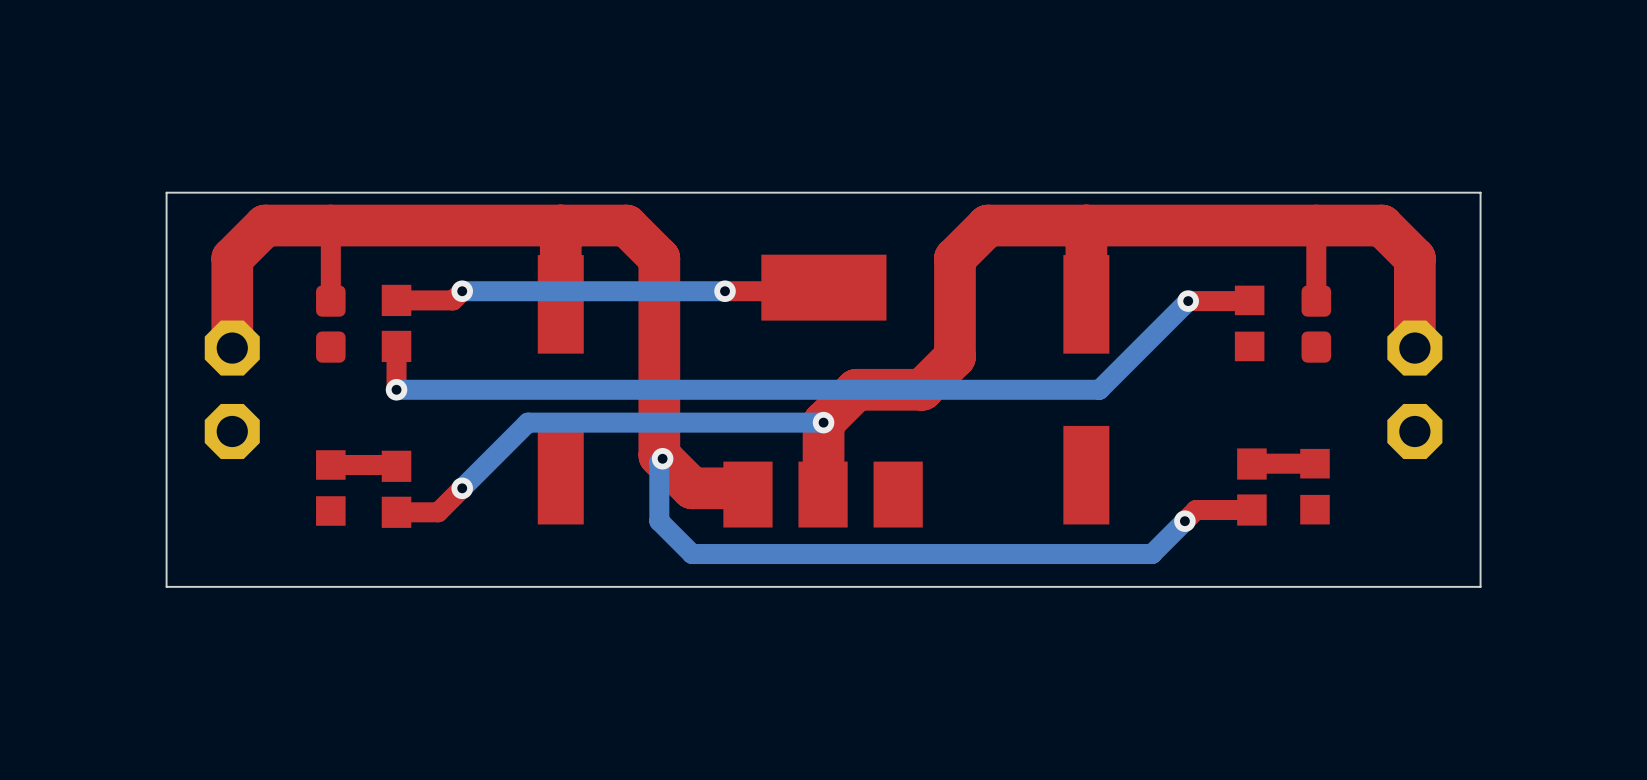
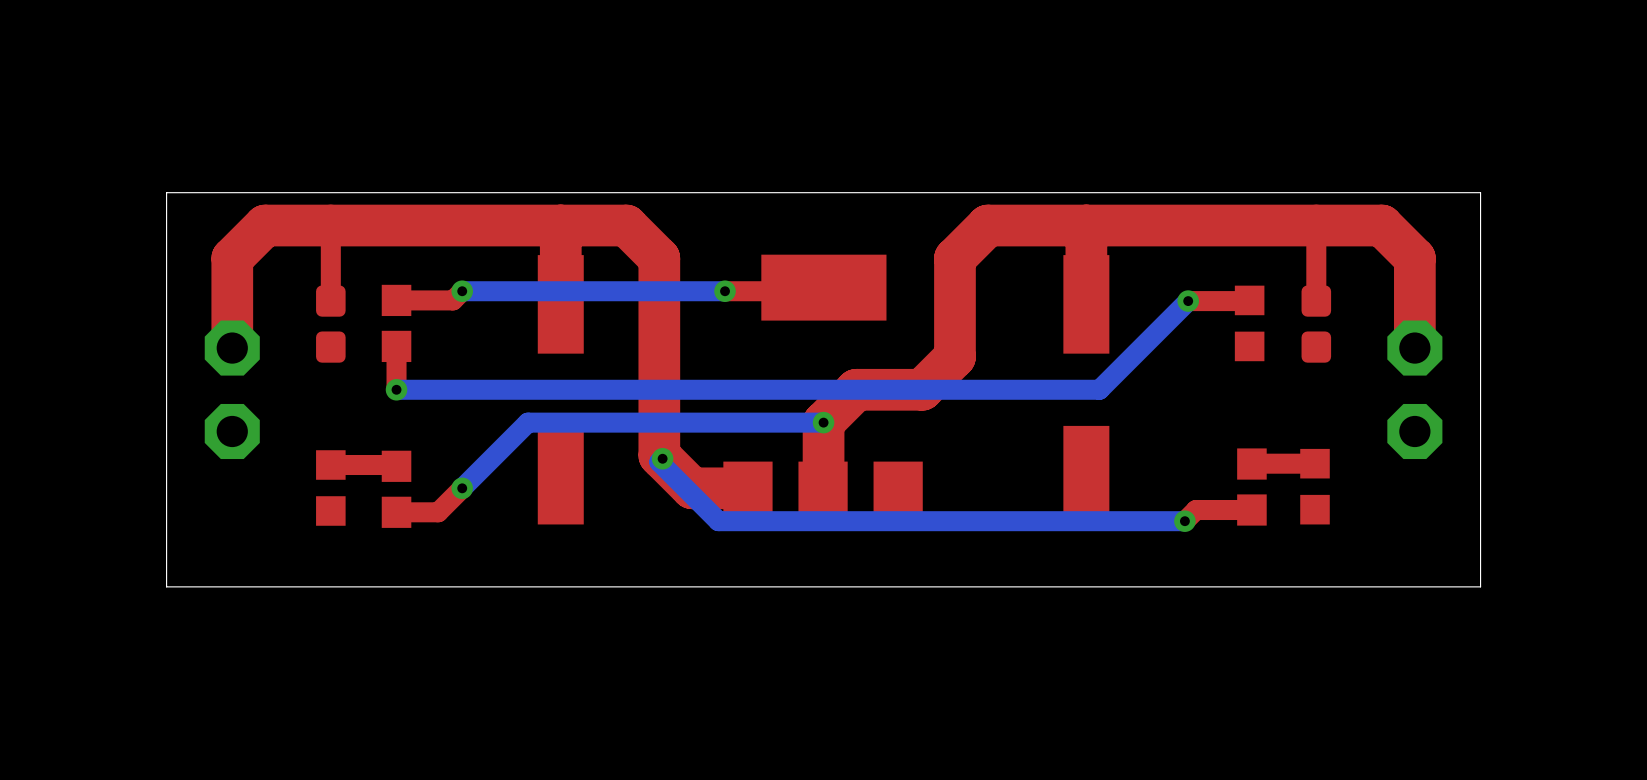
bottom track: (659, 462) (659, 521) (692, 554) (1152, 554) (1184, 521) -> (659, 462) (718, 521) (1184, 521)

